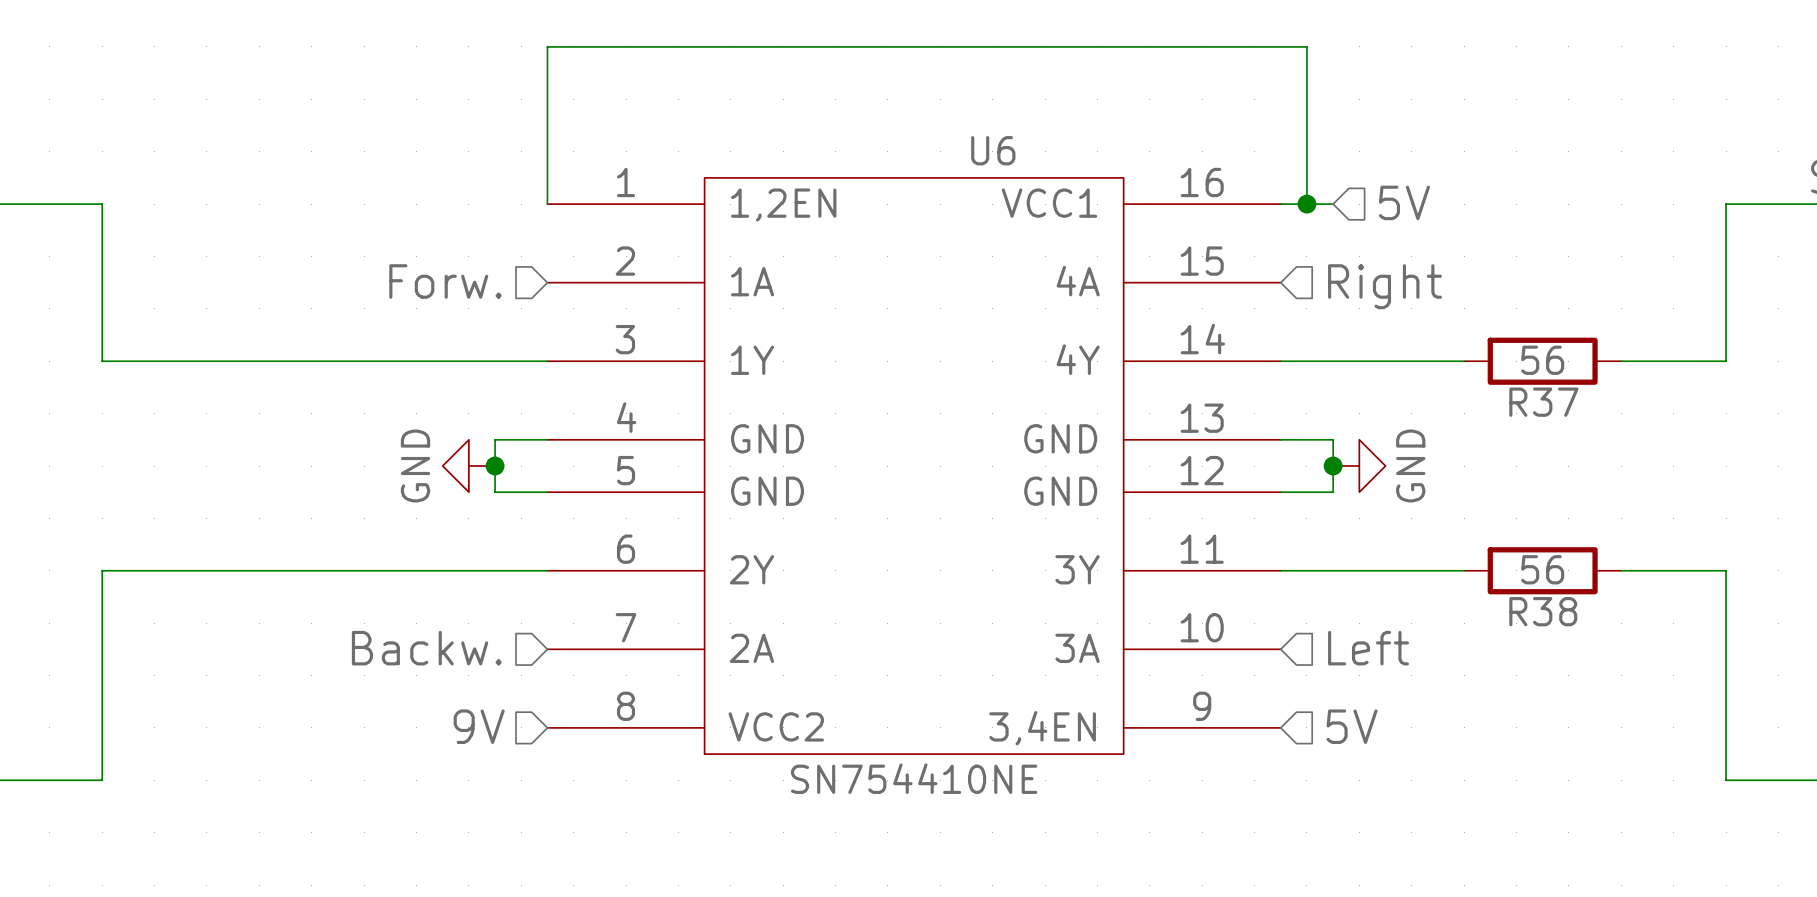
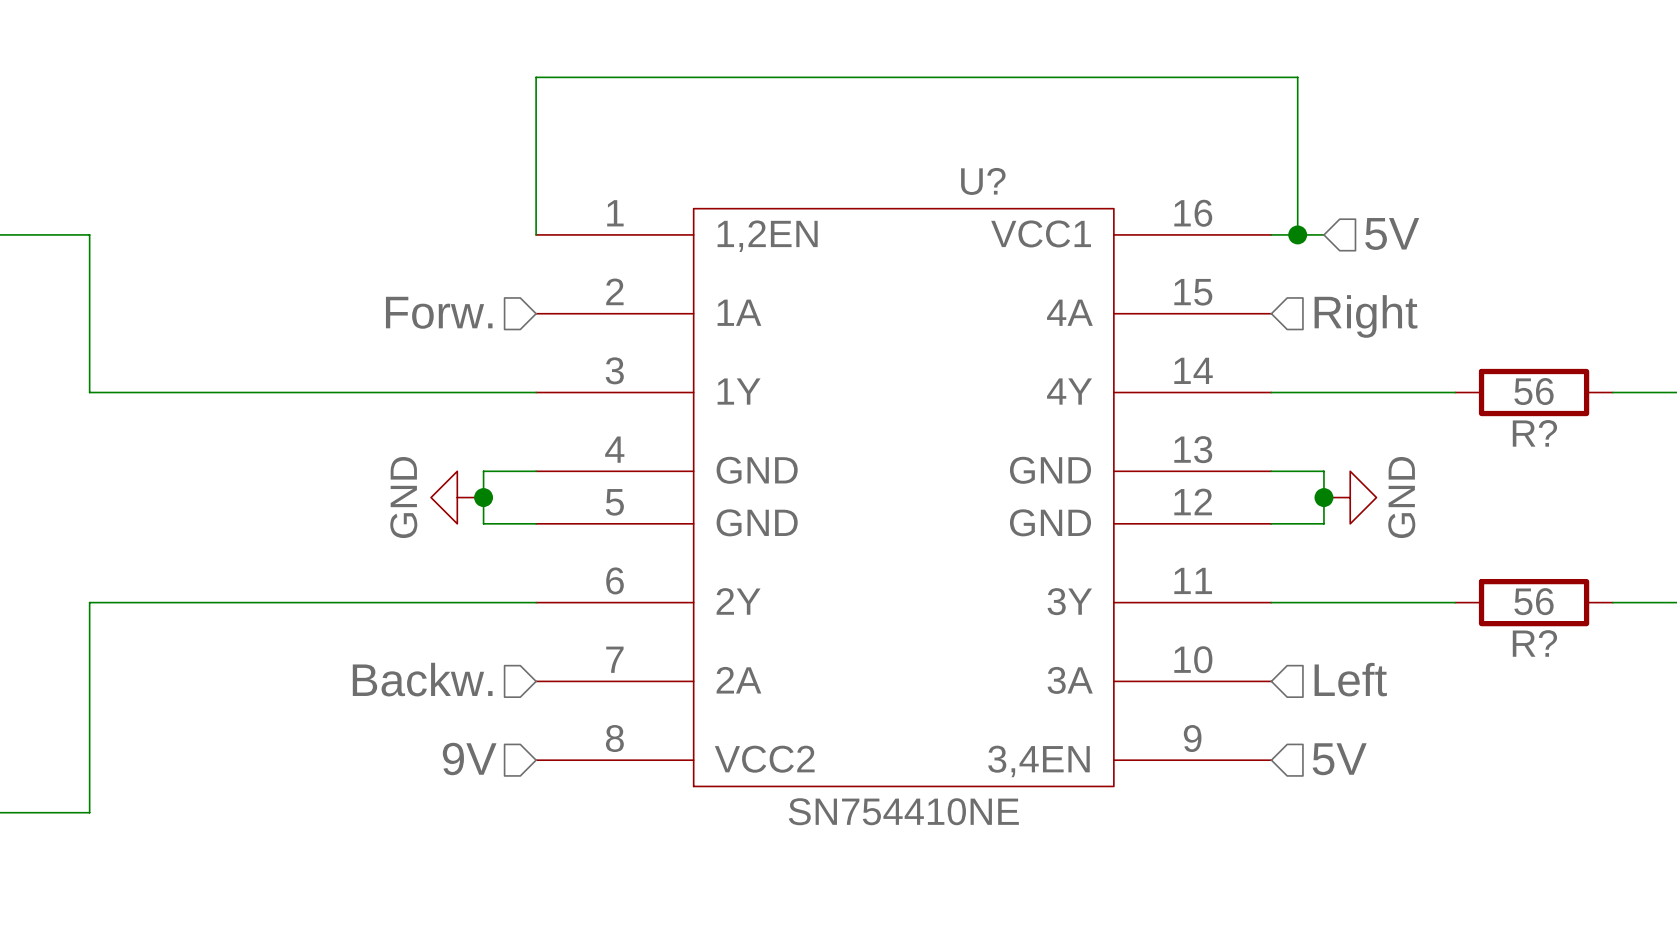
U6 name: U6 (993, 150) -> U? (983, 181)
R37 name: R37 (1543, 402) -> R? (1534, 433)
R38 name: R38 (1543, 611) -> R? (1534, 643)

